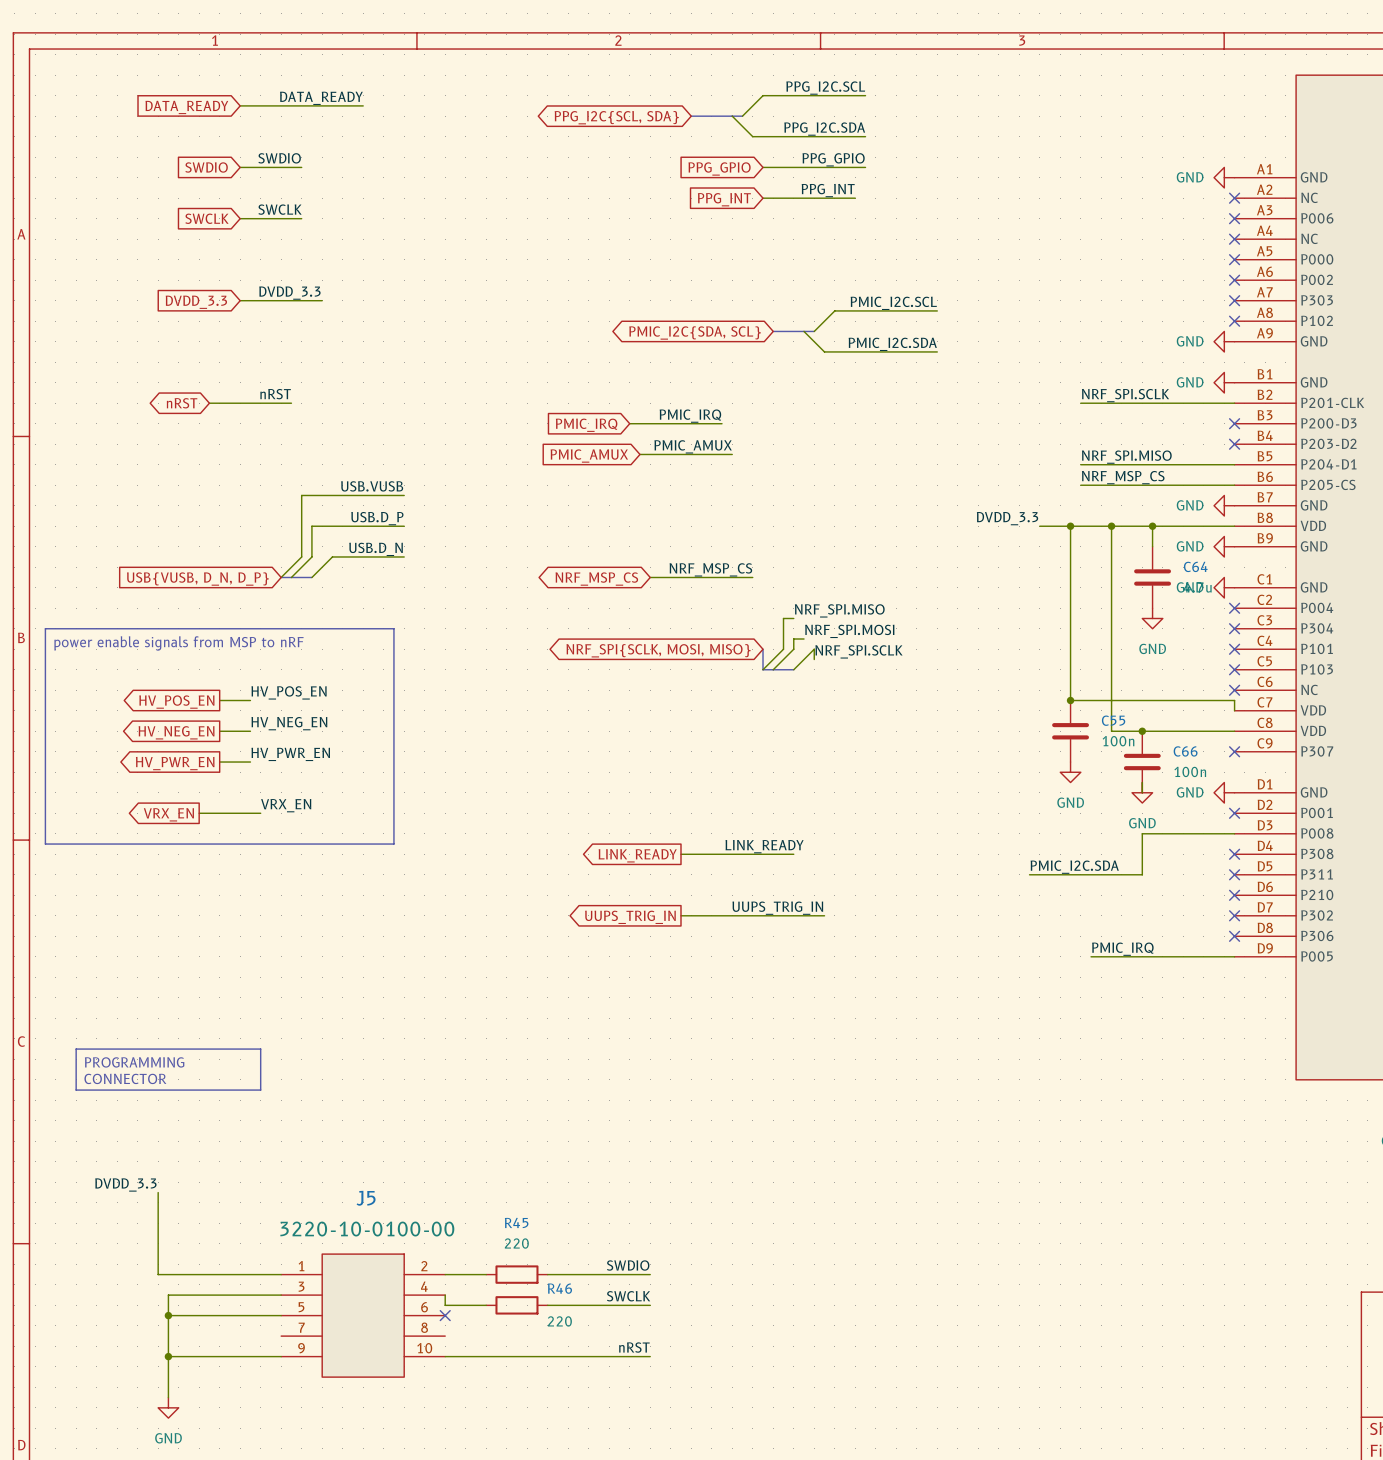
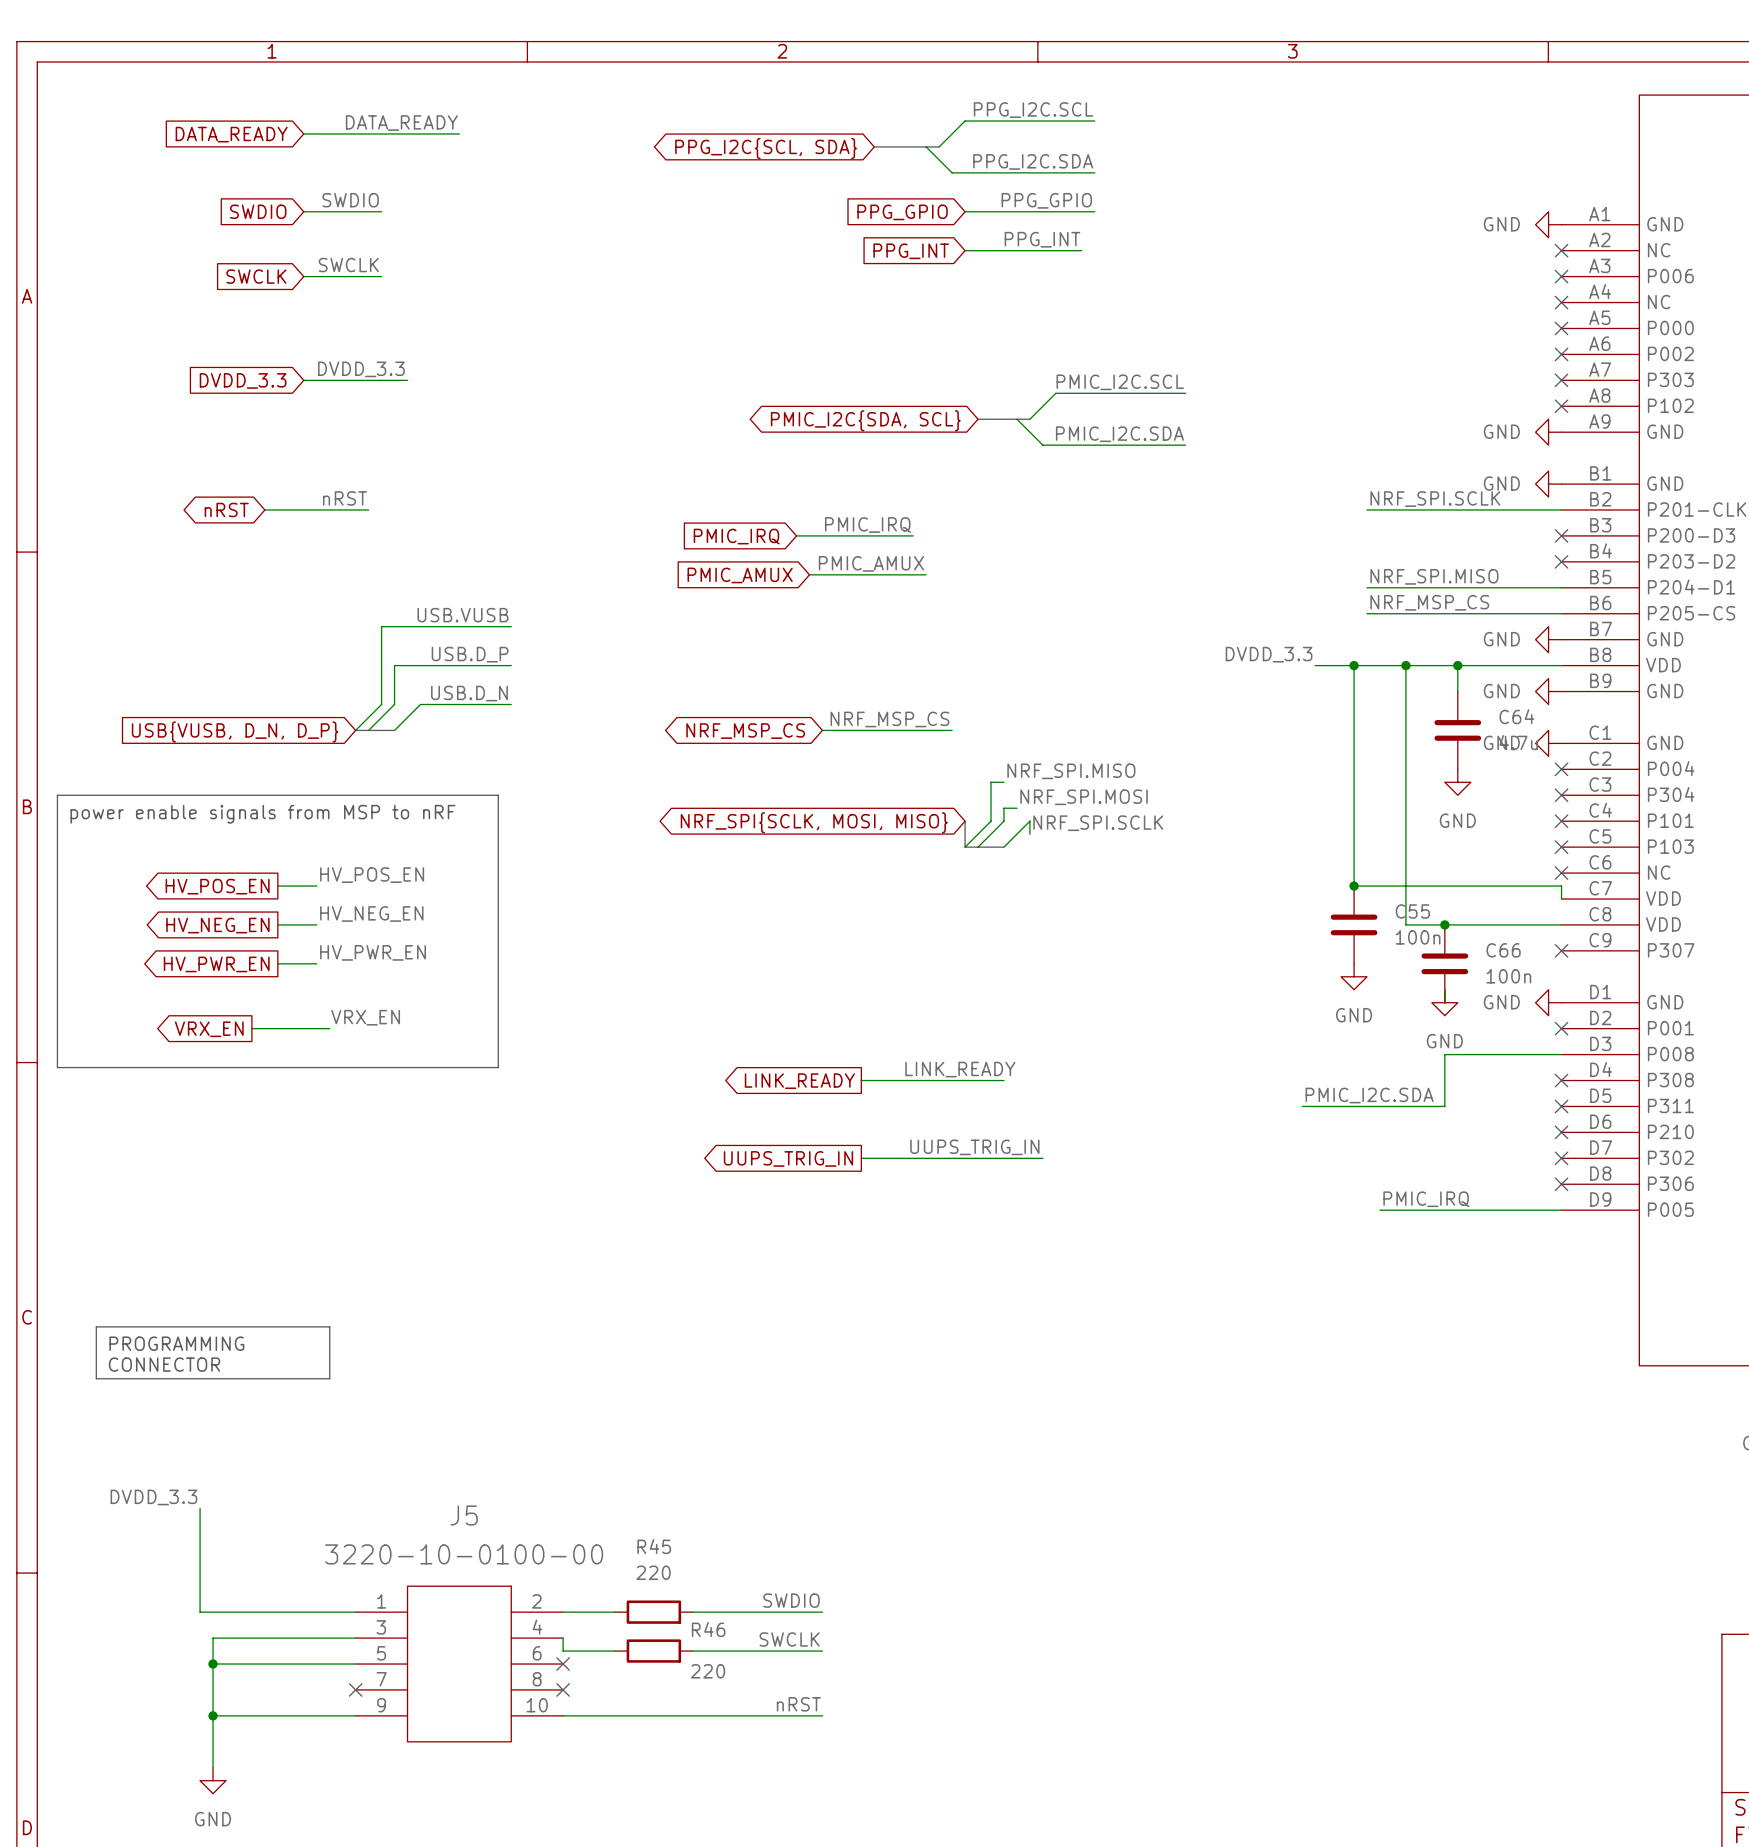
no-connect mark: none -> (355, 1689)
no-connect mark: none -> (563, 1689)

